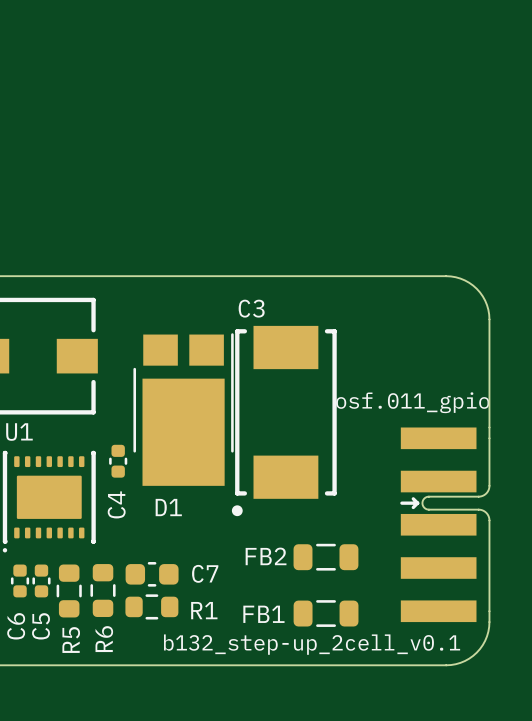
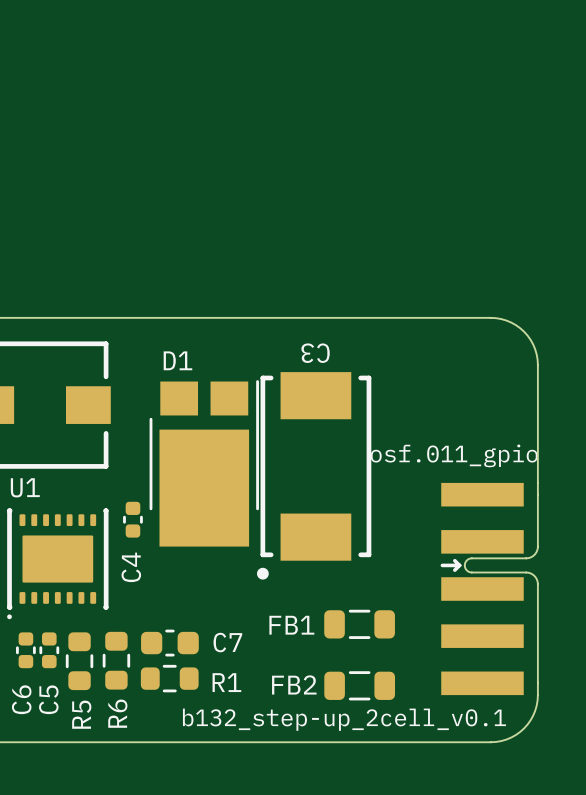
C3 name rotation: 0° (251, 308) -> 180° (315, 353)
D1 name position: D1 (168, 507) -> D1 (177, 360)
FB2 name: FB2 (266, 556) -> FB1 (291, 625)
FB1 name: FB1 (263, 614) -> FB2 (294, 684)

